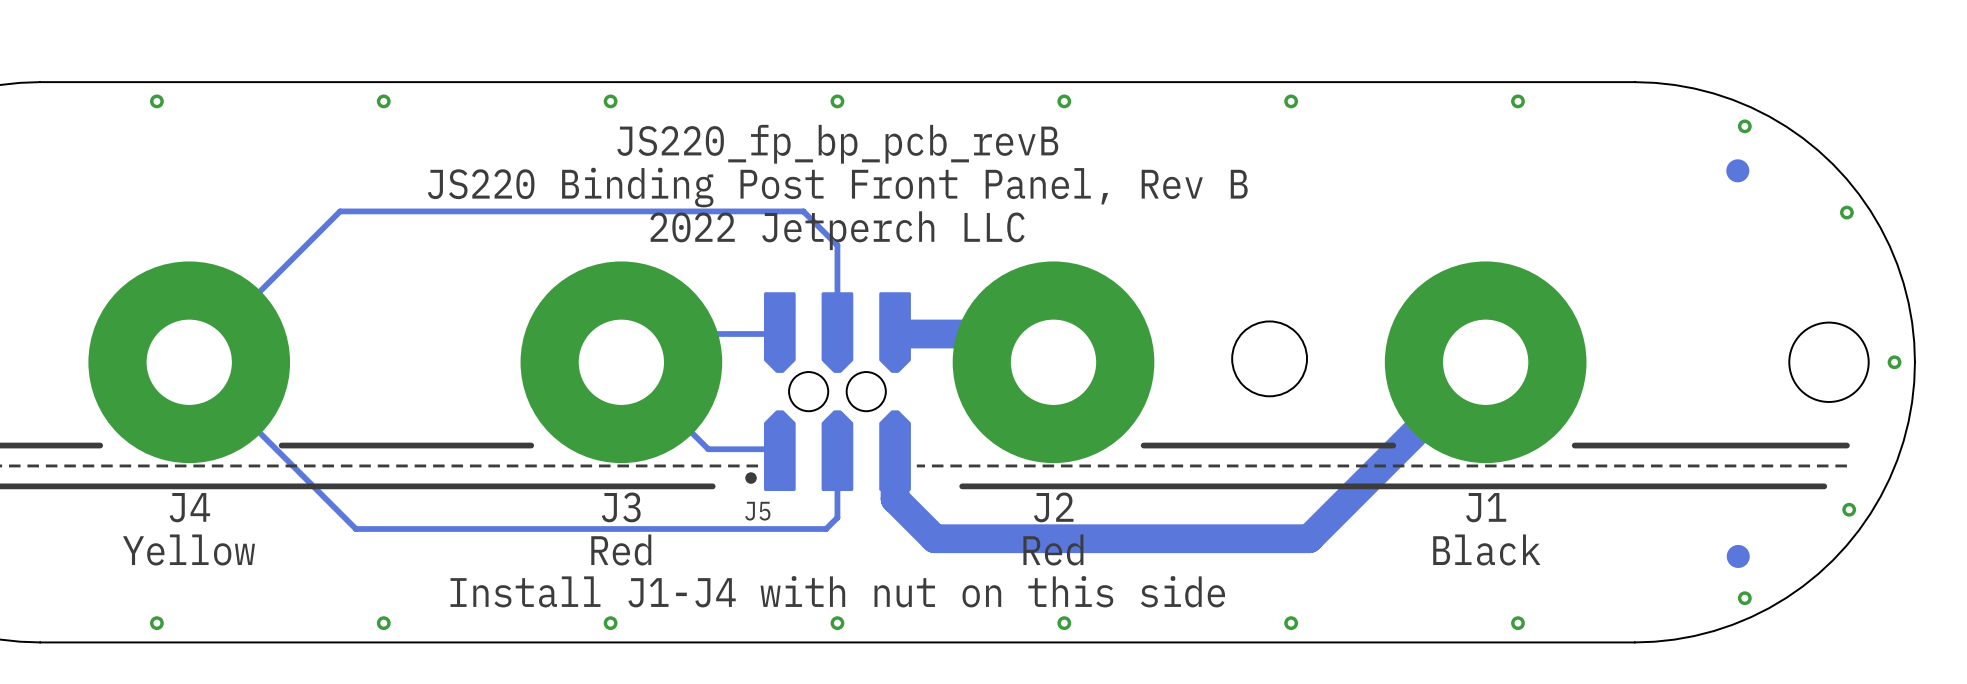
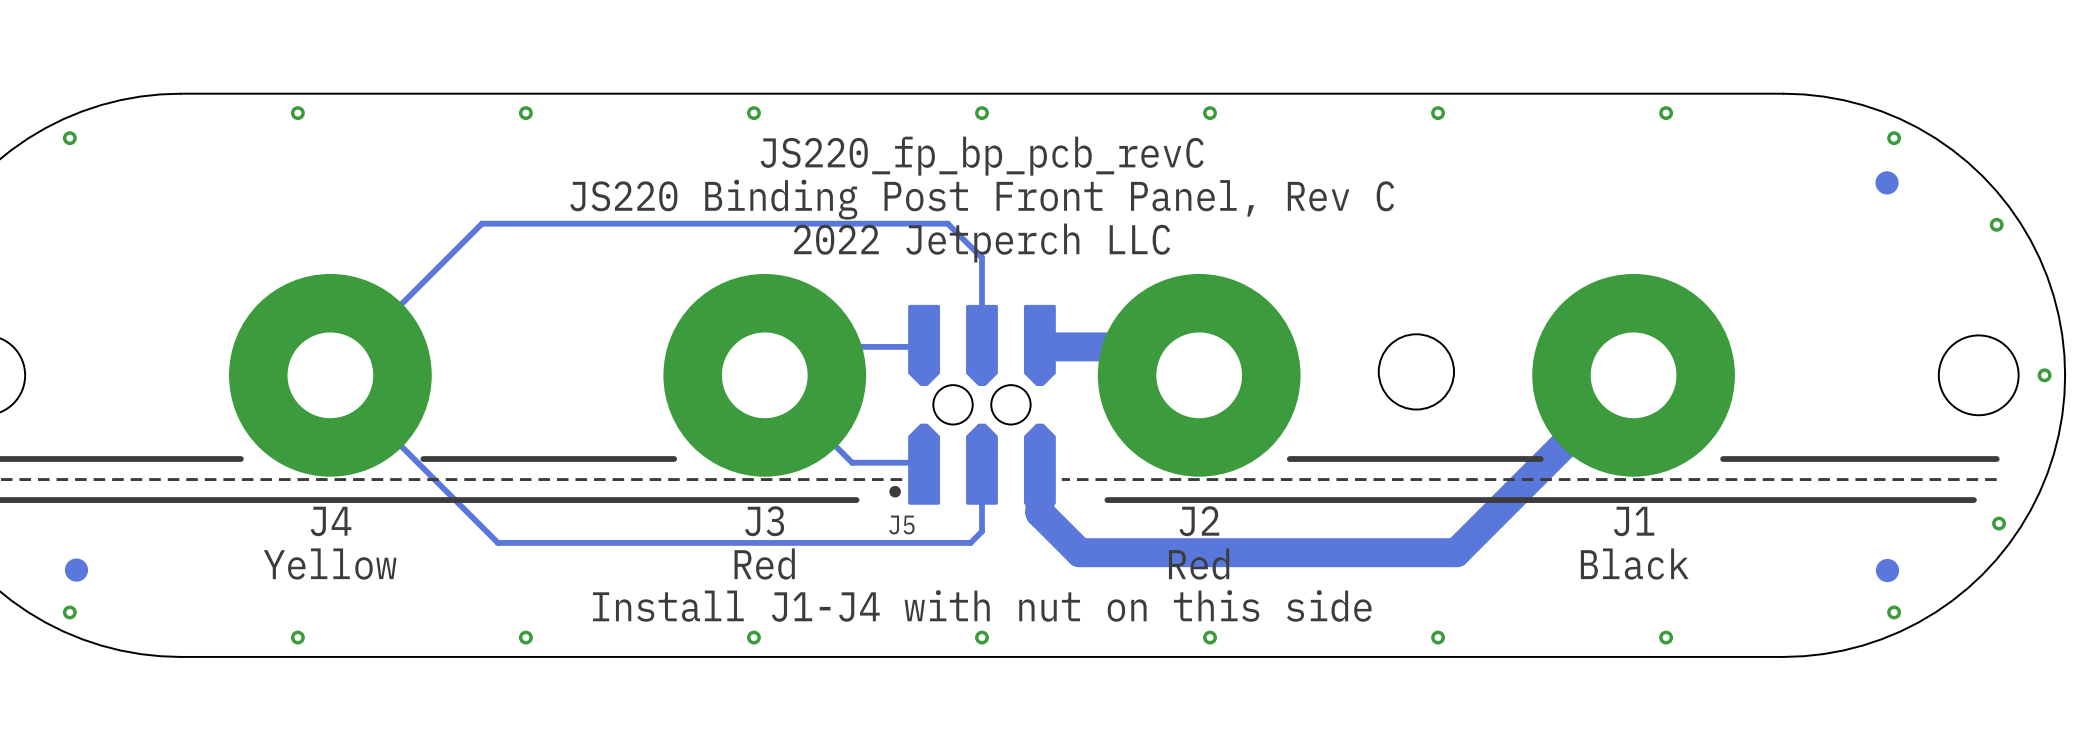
text: JS220_fp_bp_pcb_revB (837, 144) -> JS220_fp_bp_pcb_revC (982, 156)
text: JS220 Binding Post Front Panel, Rev B (837, 187) -> JS220 Binding Post Front Panel, Rev C (982, 199)

